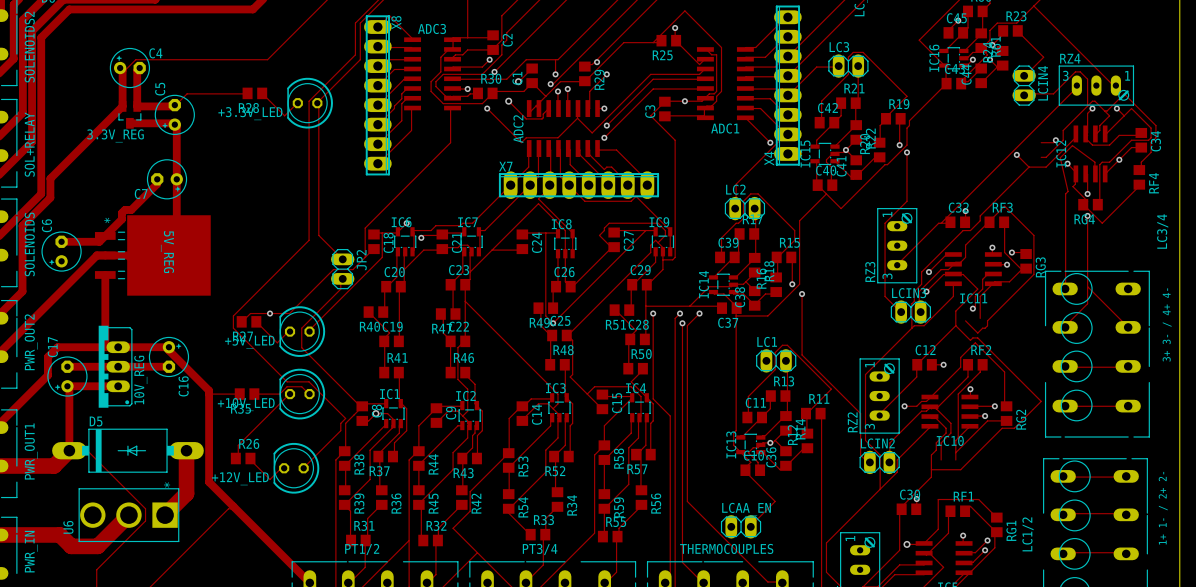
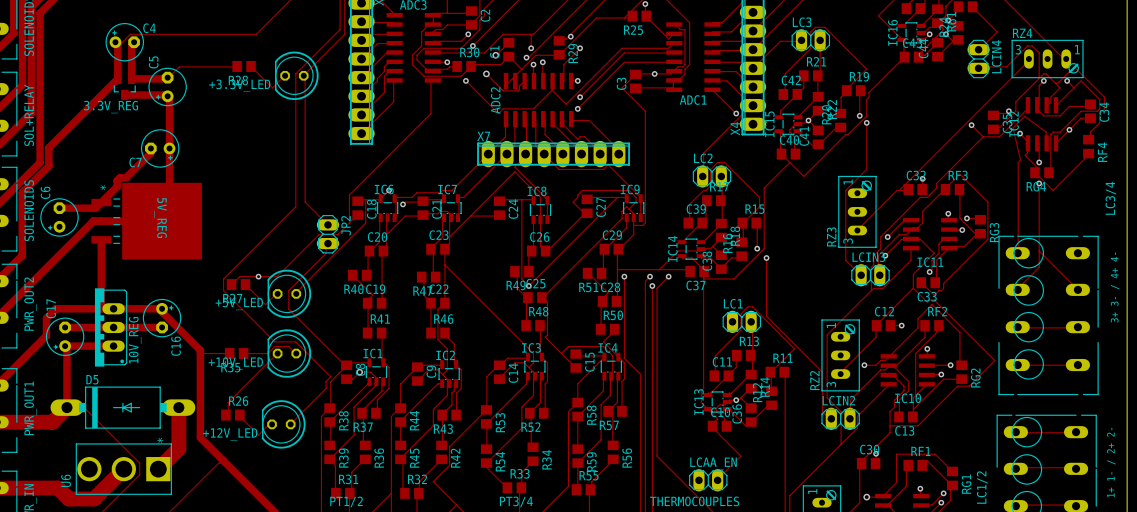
C35: none -> (993, 122)
C33: none -> (928, 282)
C13: none -> (905, 416)

